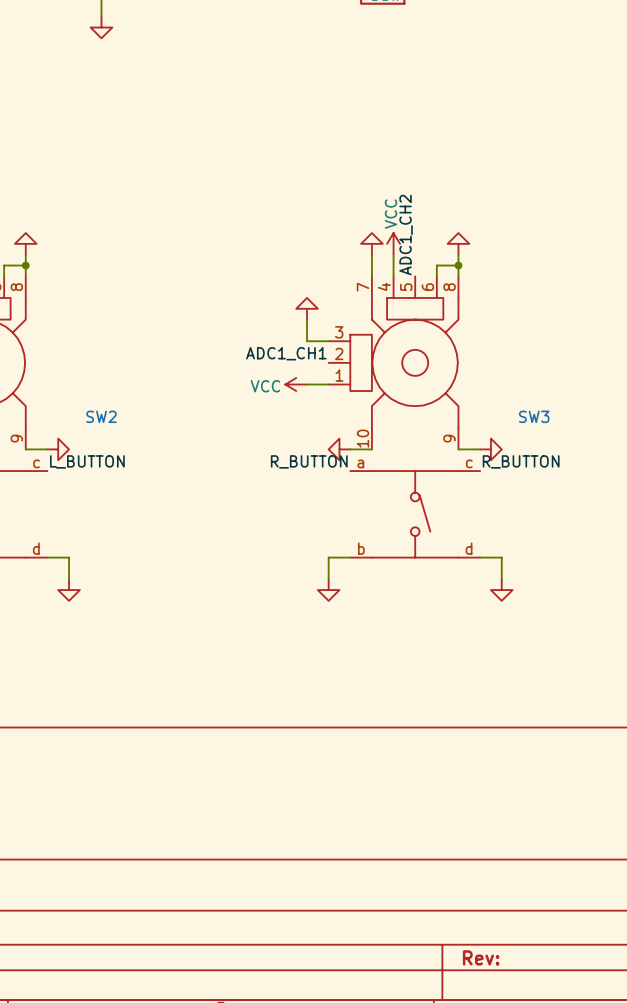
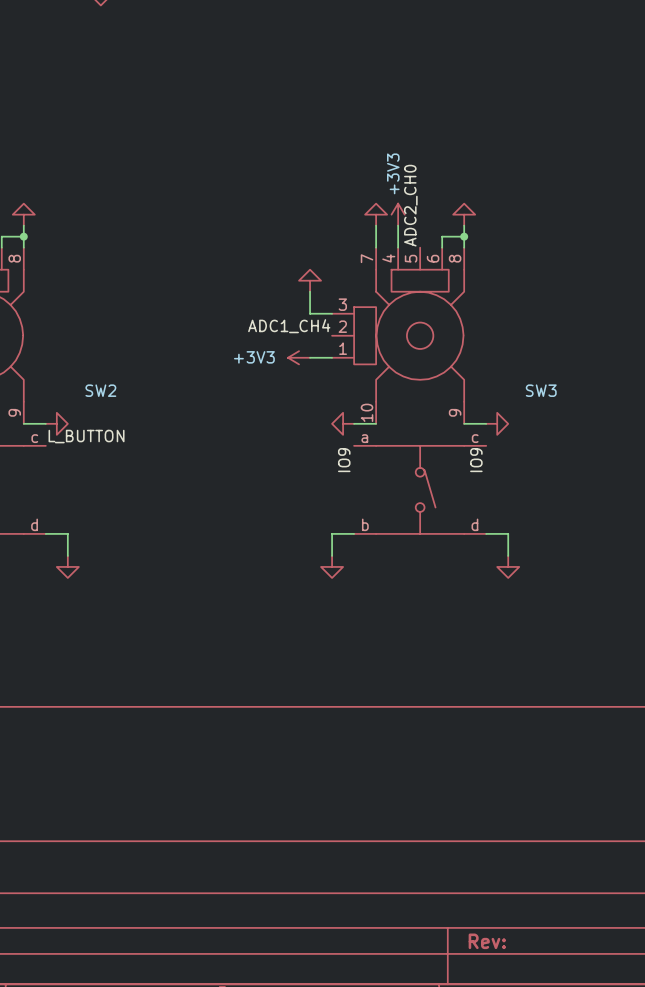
label: ADC1_CH2 (406, 235) -> ADC2_CH0 (410, 205)
power symbol: VCC (393, 243) -> +3V3 (398, 214)
label: ADC1_CH1 (286, 353) -> ADC1_CH4 (289, 326)
power symbol: VCC (296, 384) -> +3V3 (299, 357)
label: R_BUTTON (309, 461) -> IO9 (344, 460)
label: R_BUTTON (521, 461) -> IO9 (476, 460)

